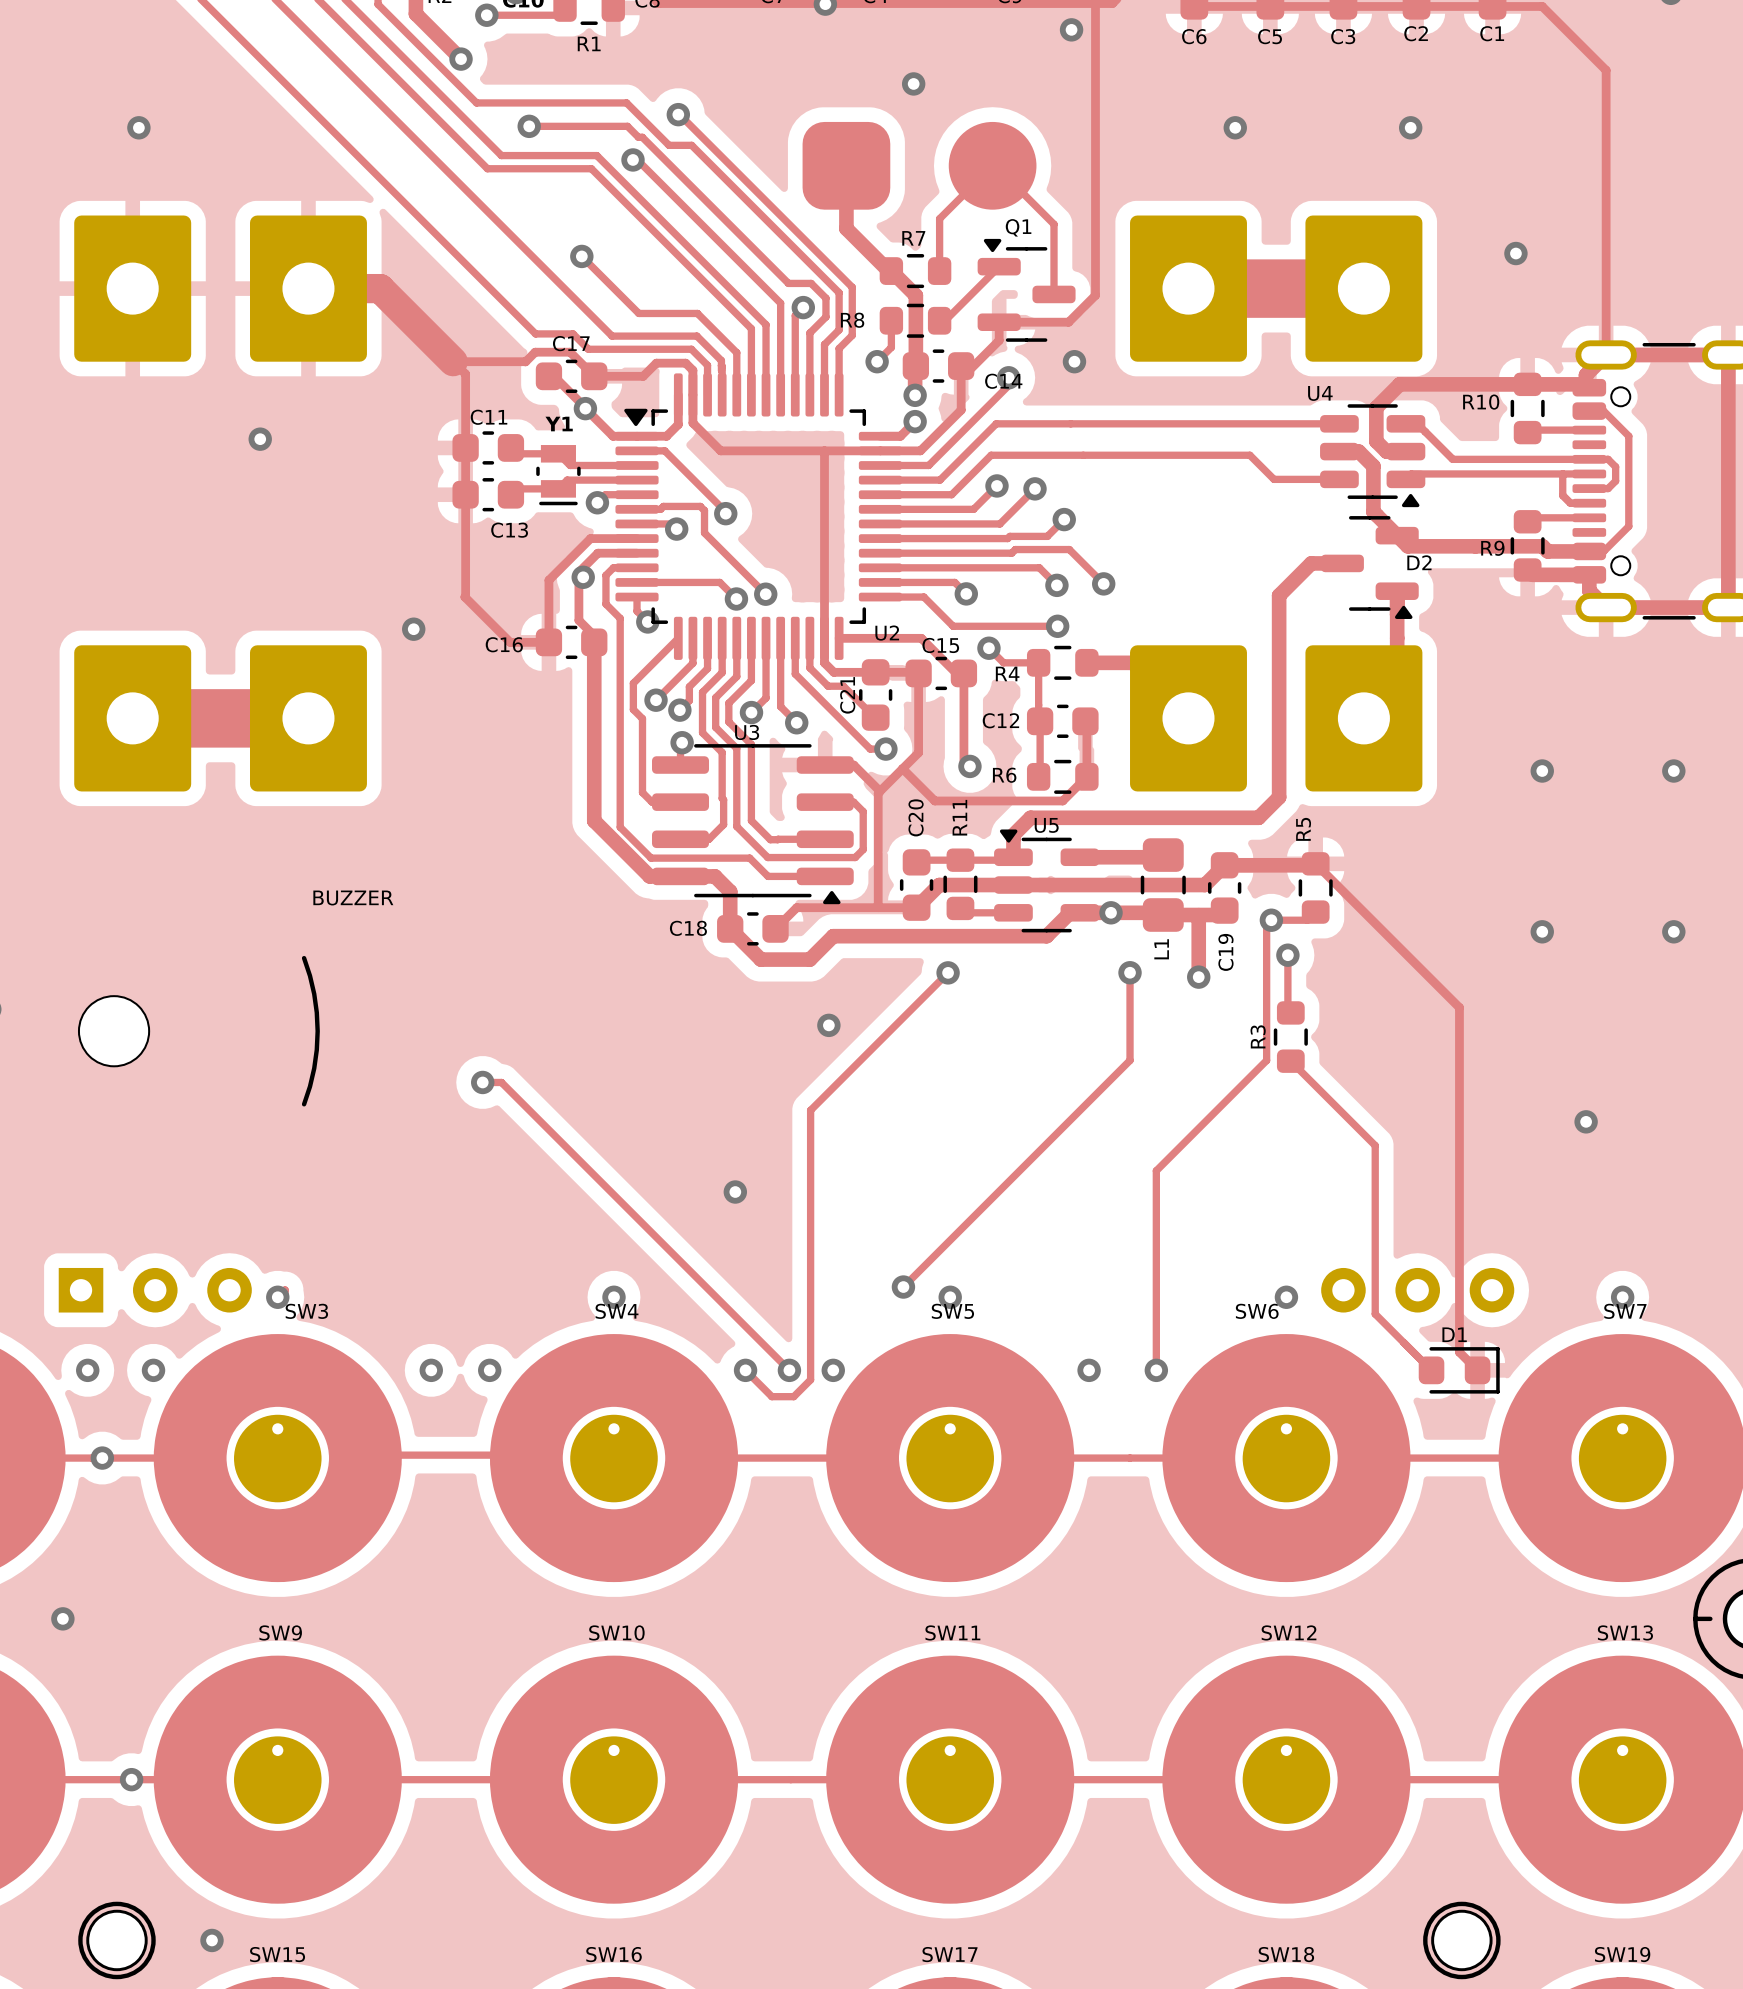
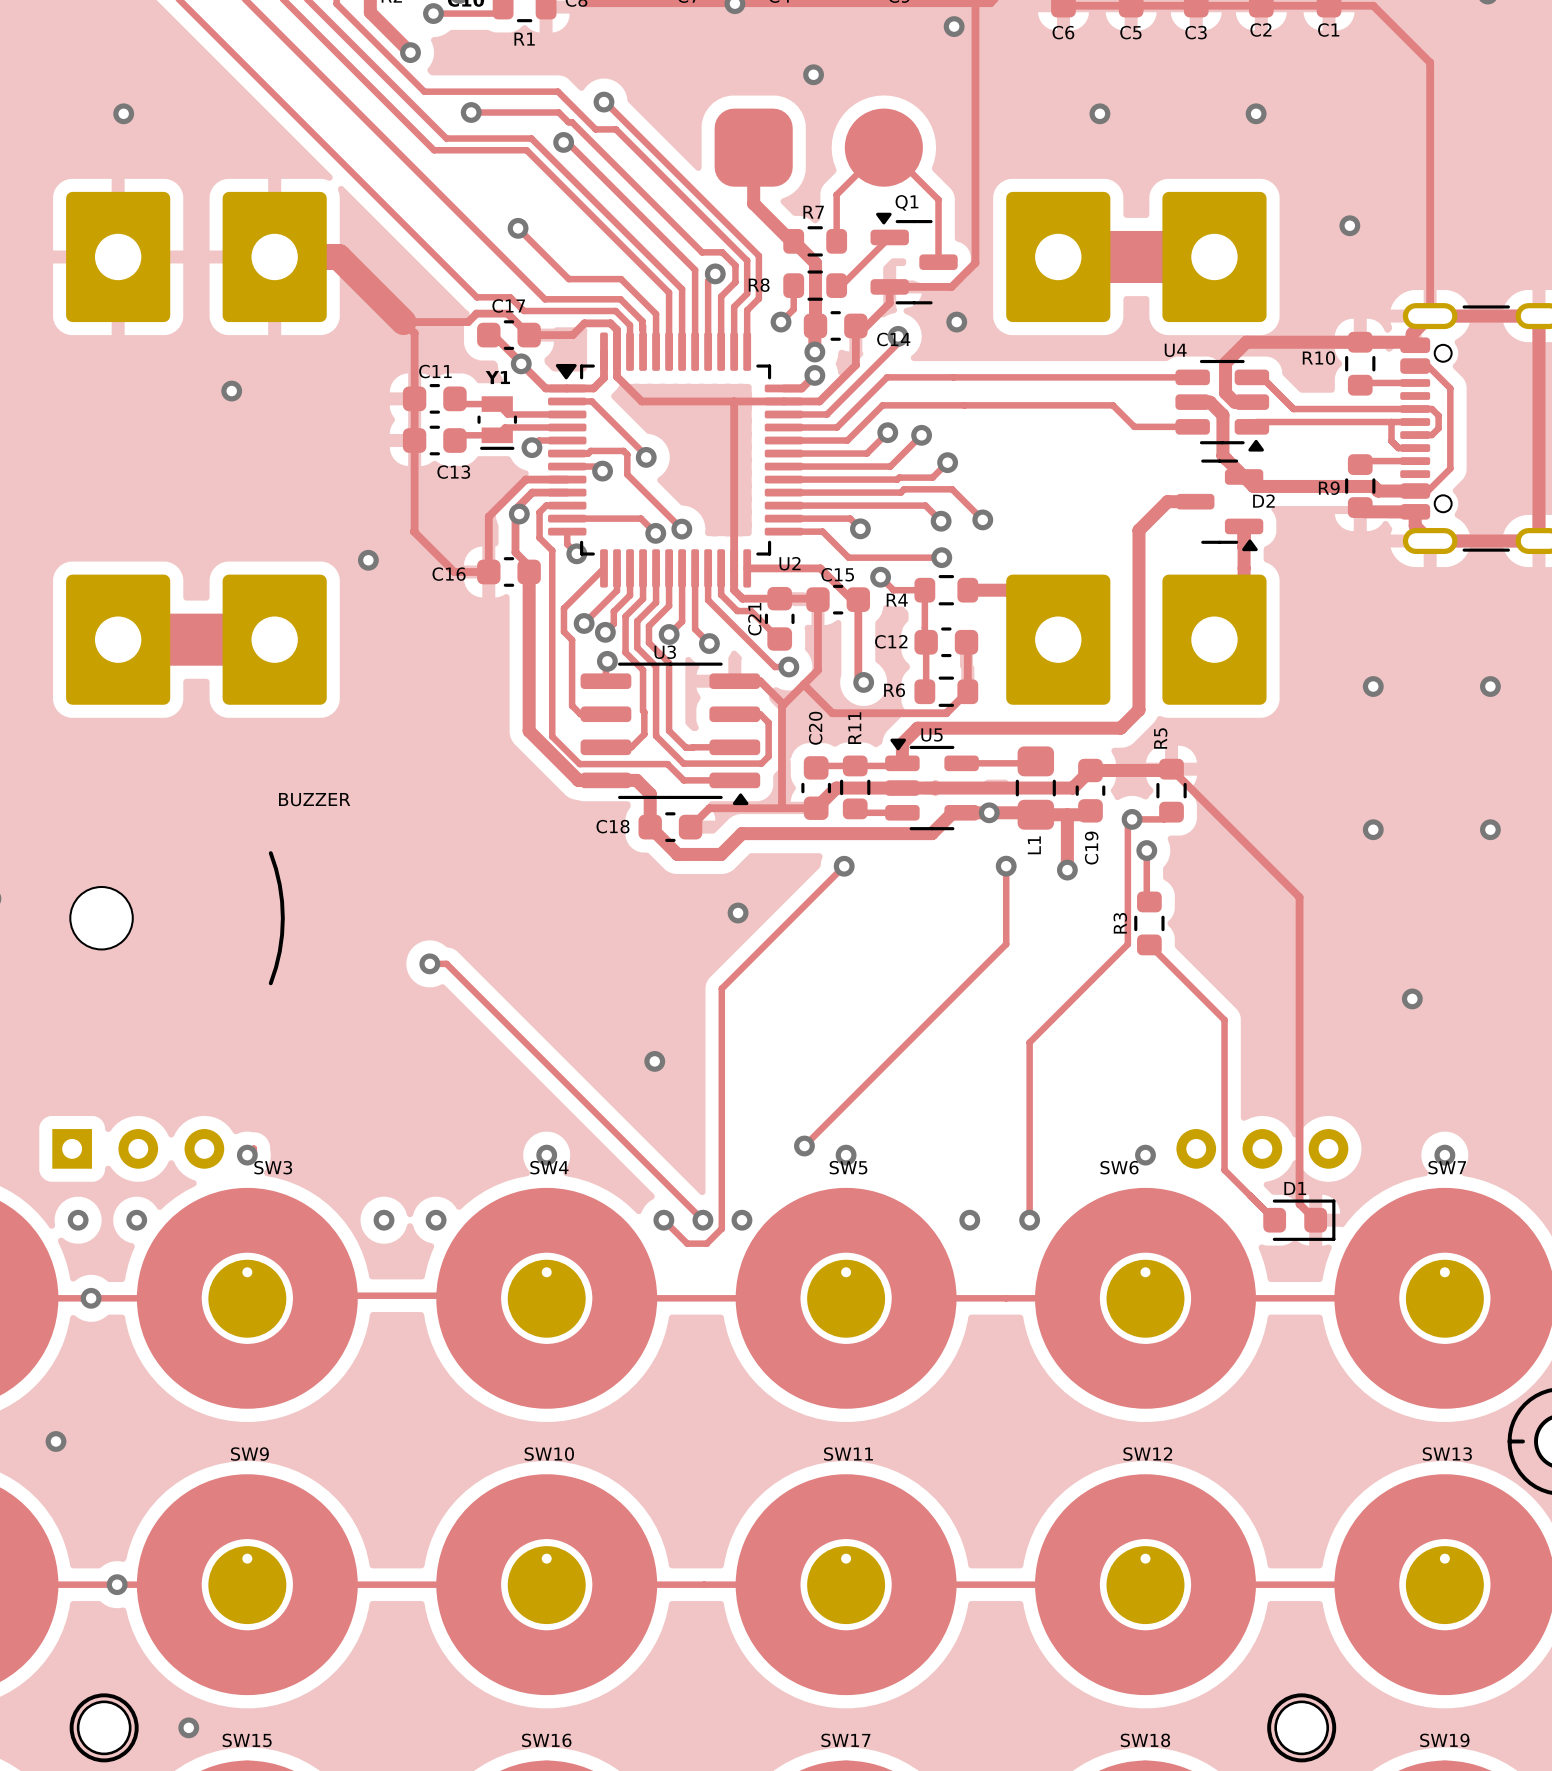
track width: thick (1079, 857) (1161, 857) -> thin (961, 763) (1033, 763)

